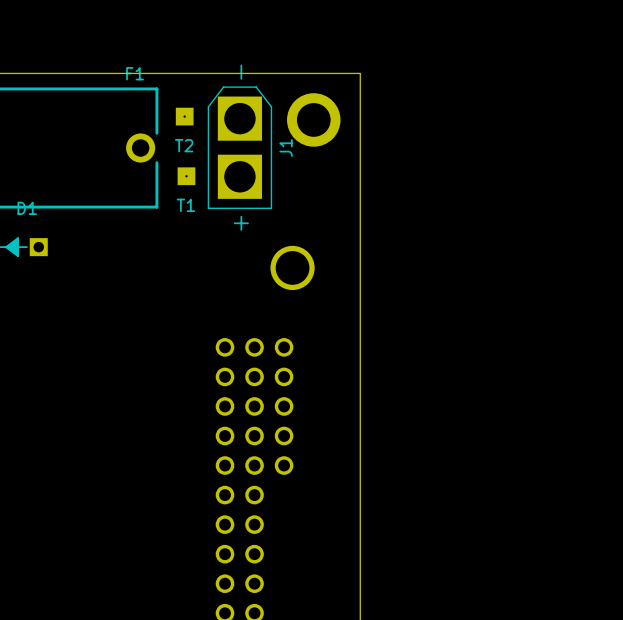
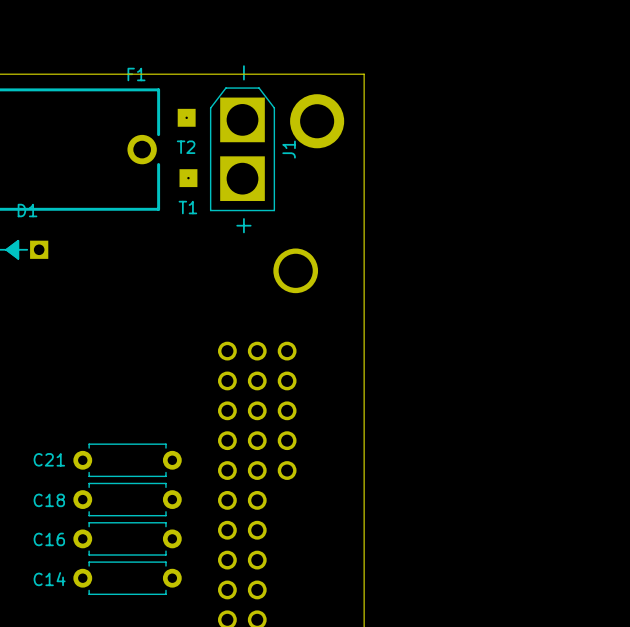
C21: none -> (127, 460)
C18: none -> (127, 499)
C16: none -> (127, 538)
C14: none -> (127, 578)

